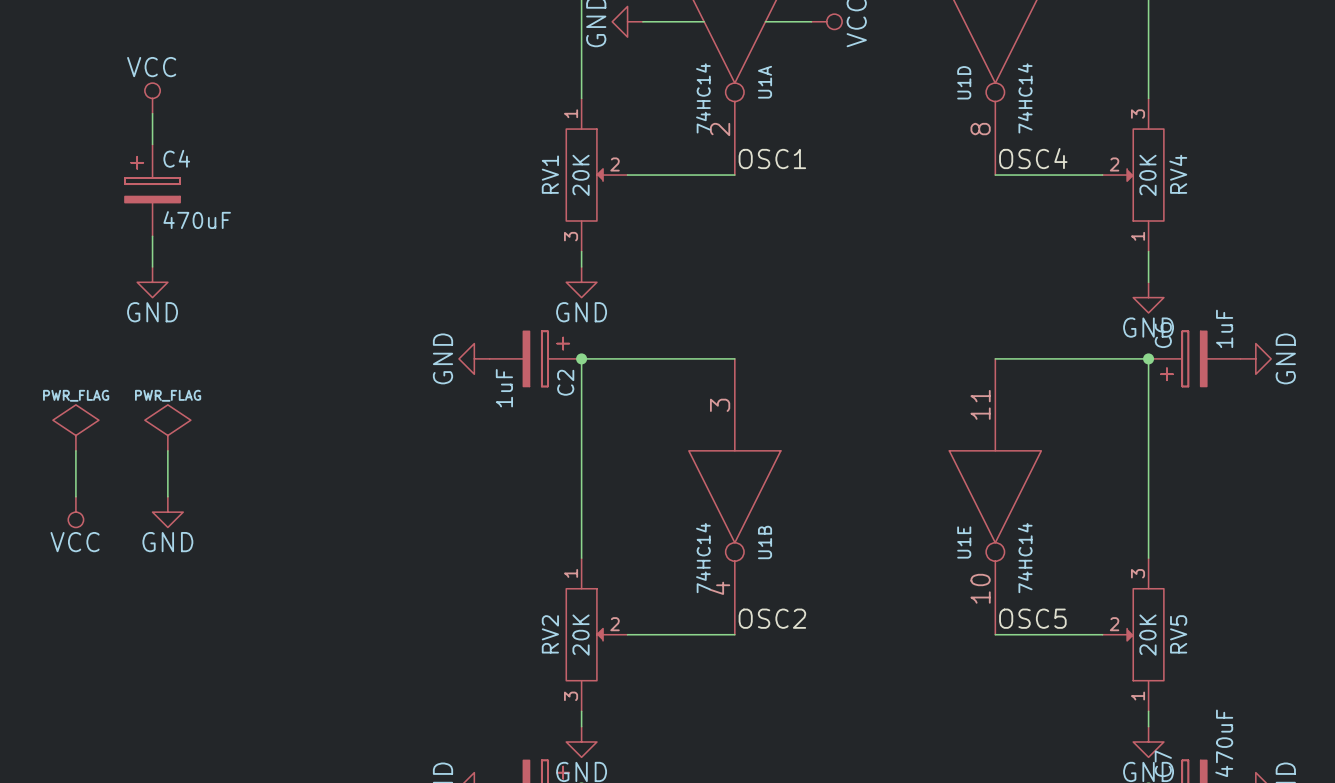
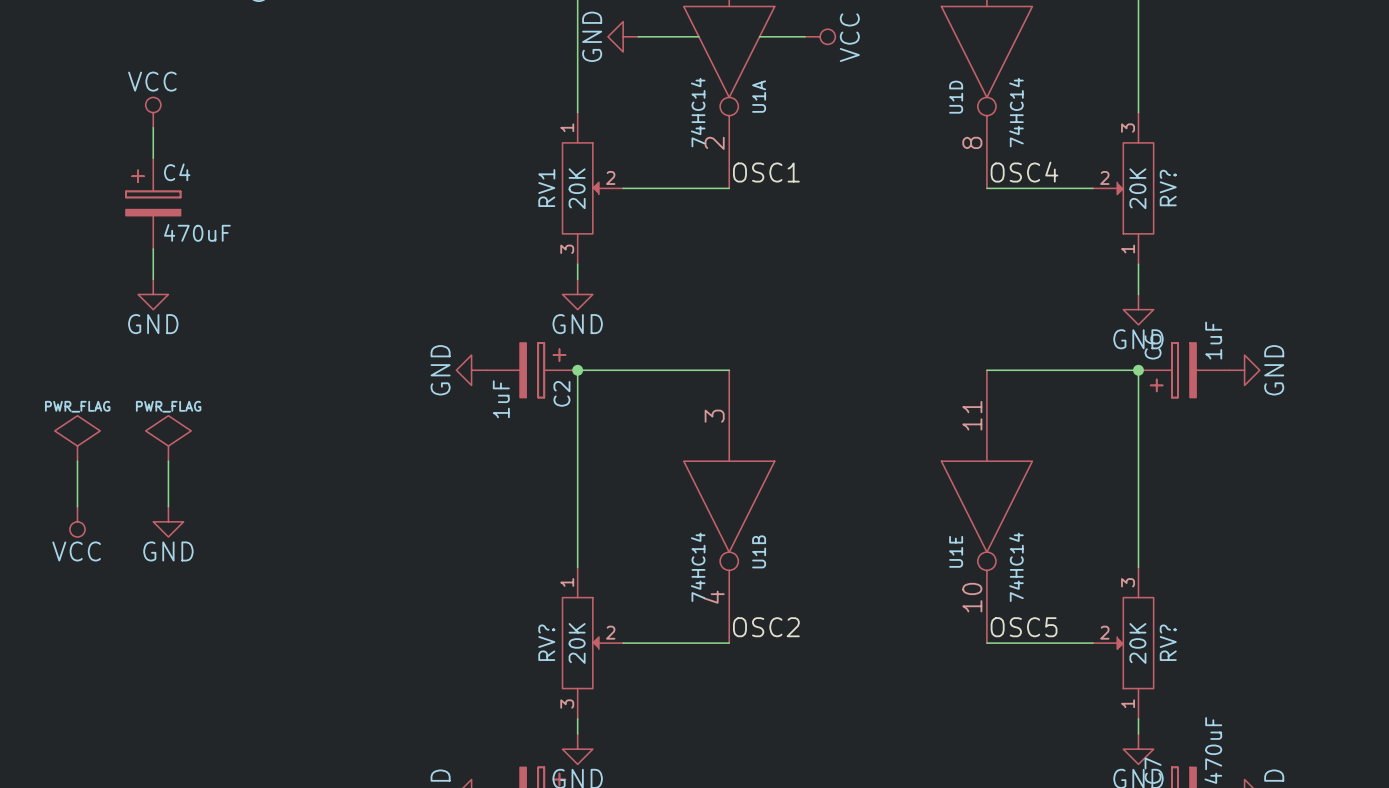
RV4 name: RV4 (1178, 174) -> RV? (1168, 188)
RV2 name: RV2 (550, 634) -> RV? (546, 642)
RV5 name: RV5 (1178, 634) -> RV? (1168, 642)

